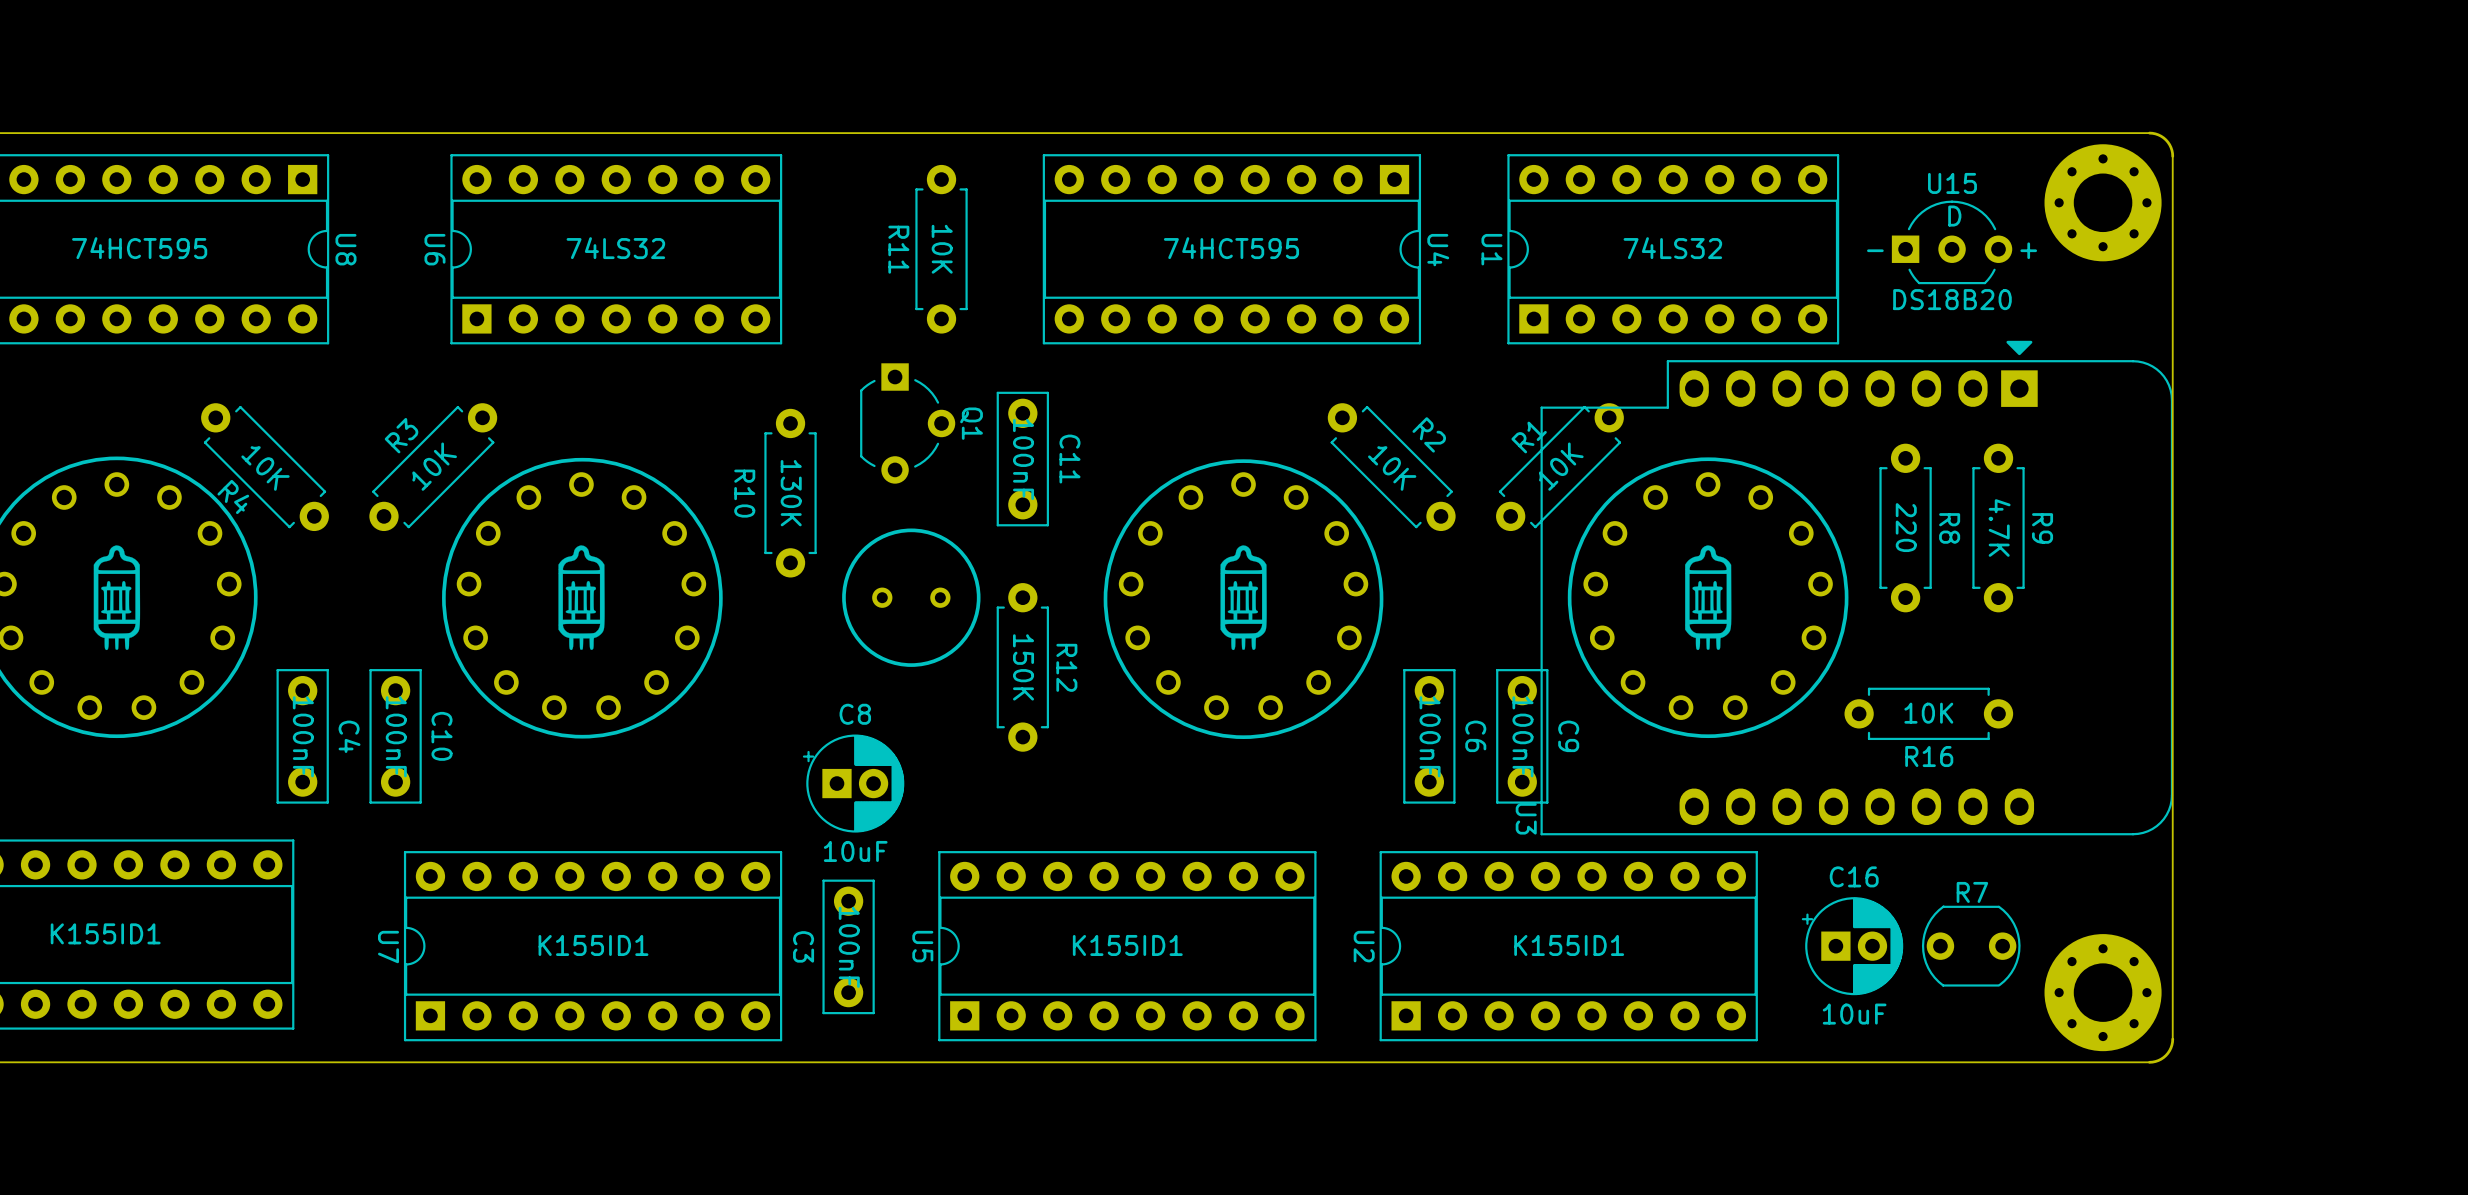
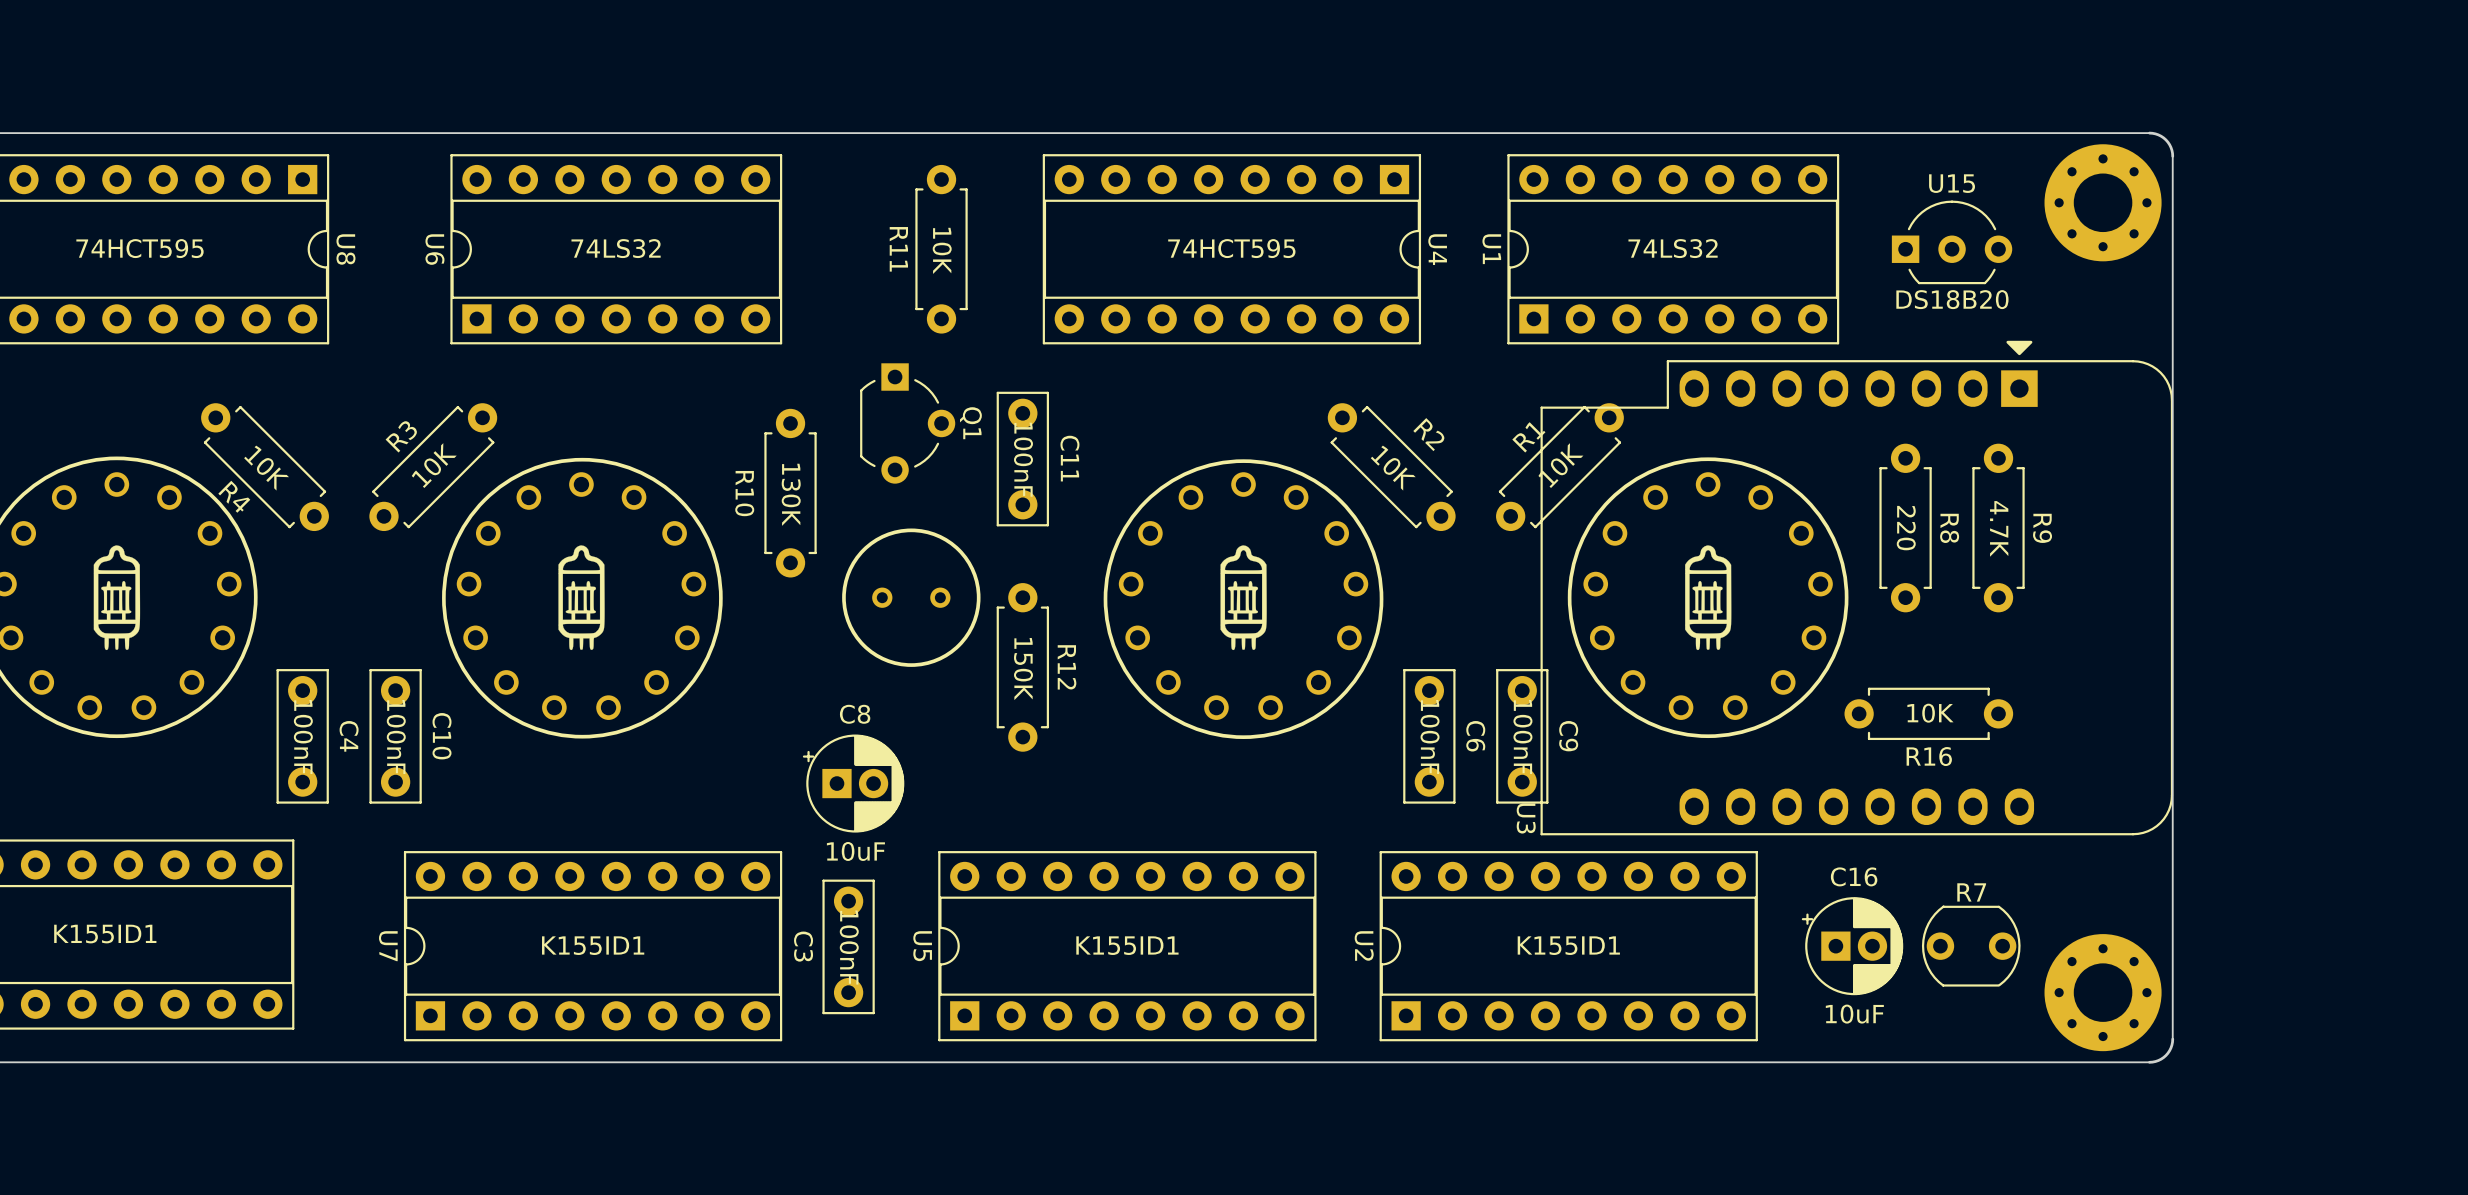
text: D (1954, 216) -> none
text: - (1875, 250) -> none
text: + (2028, 250) -> none

